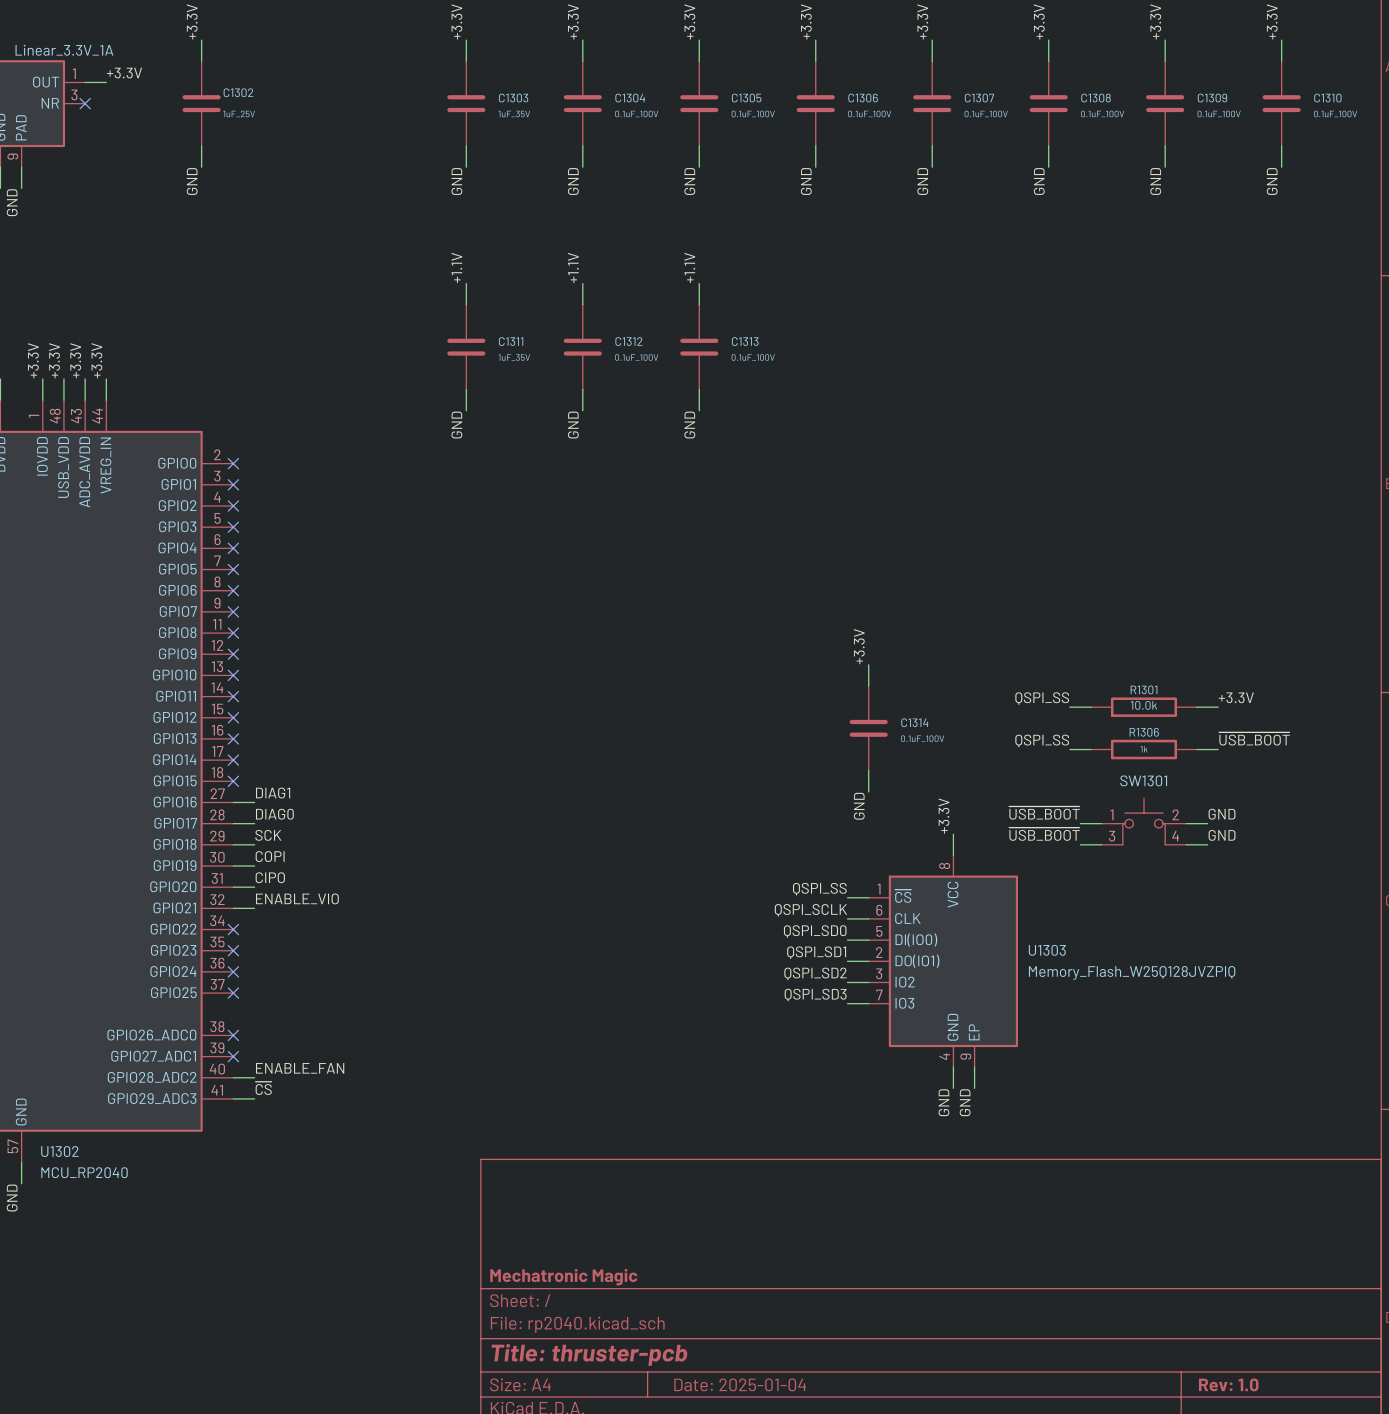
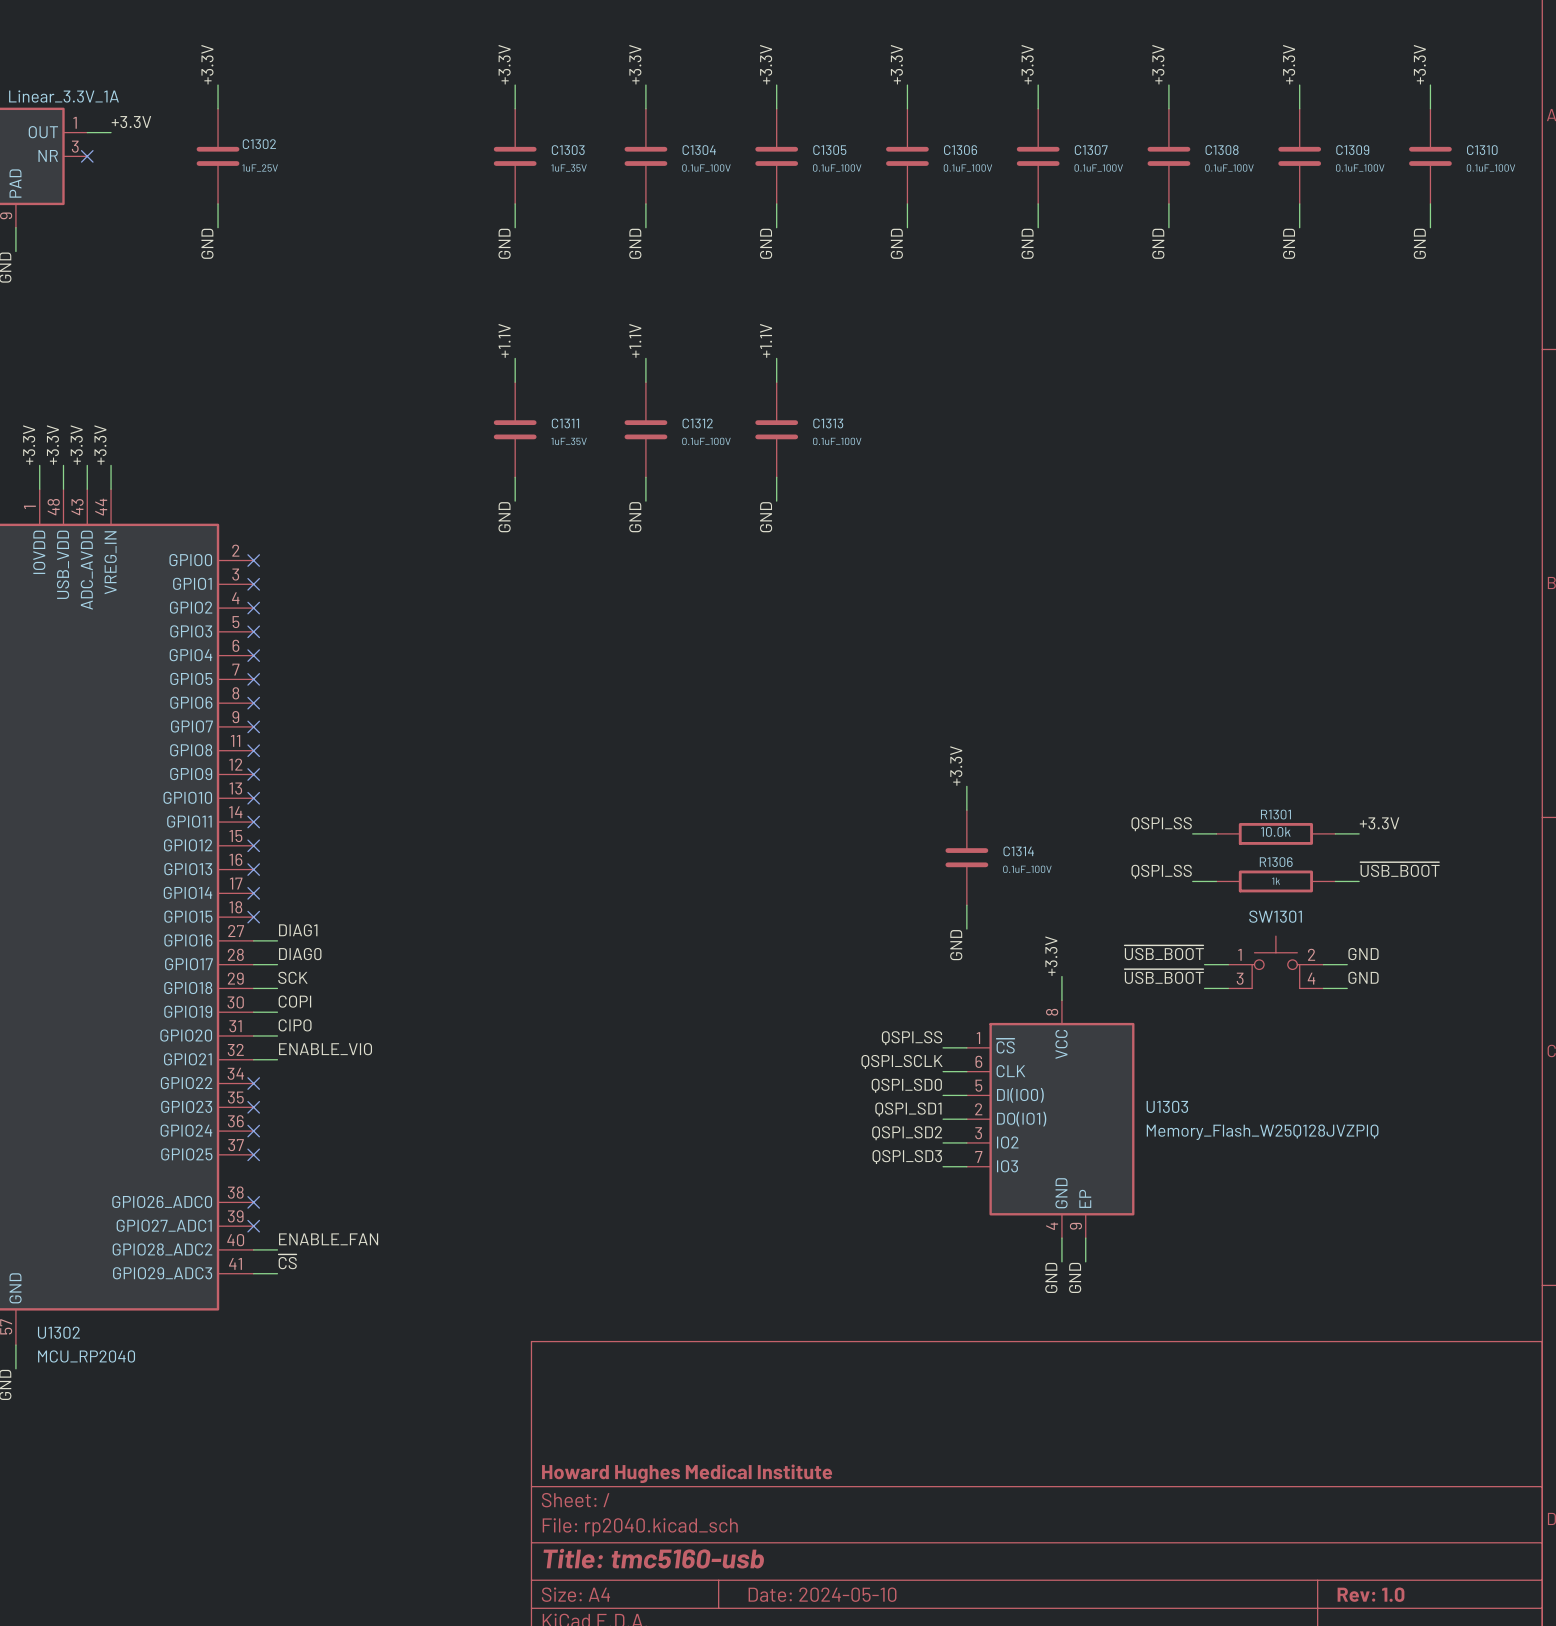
title block: Mechatronic Magic (563, 1277) -> Howard Hughes Medical Institute (687, 1473)
title block: Title: thruster-pcb (589, 1354) -> Title: tmc5160-usb (653, 1558)
title block: Date: 2025-01-04 (740, 1384) -> Date: 2024-05-10 (822, 1594)

